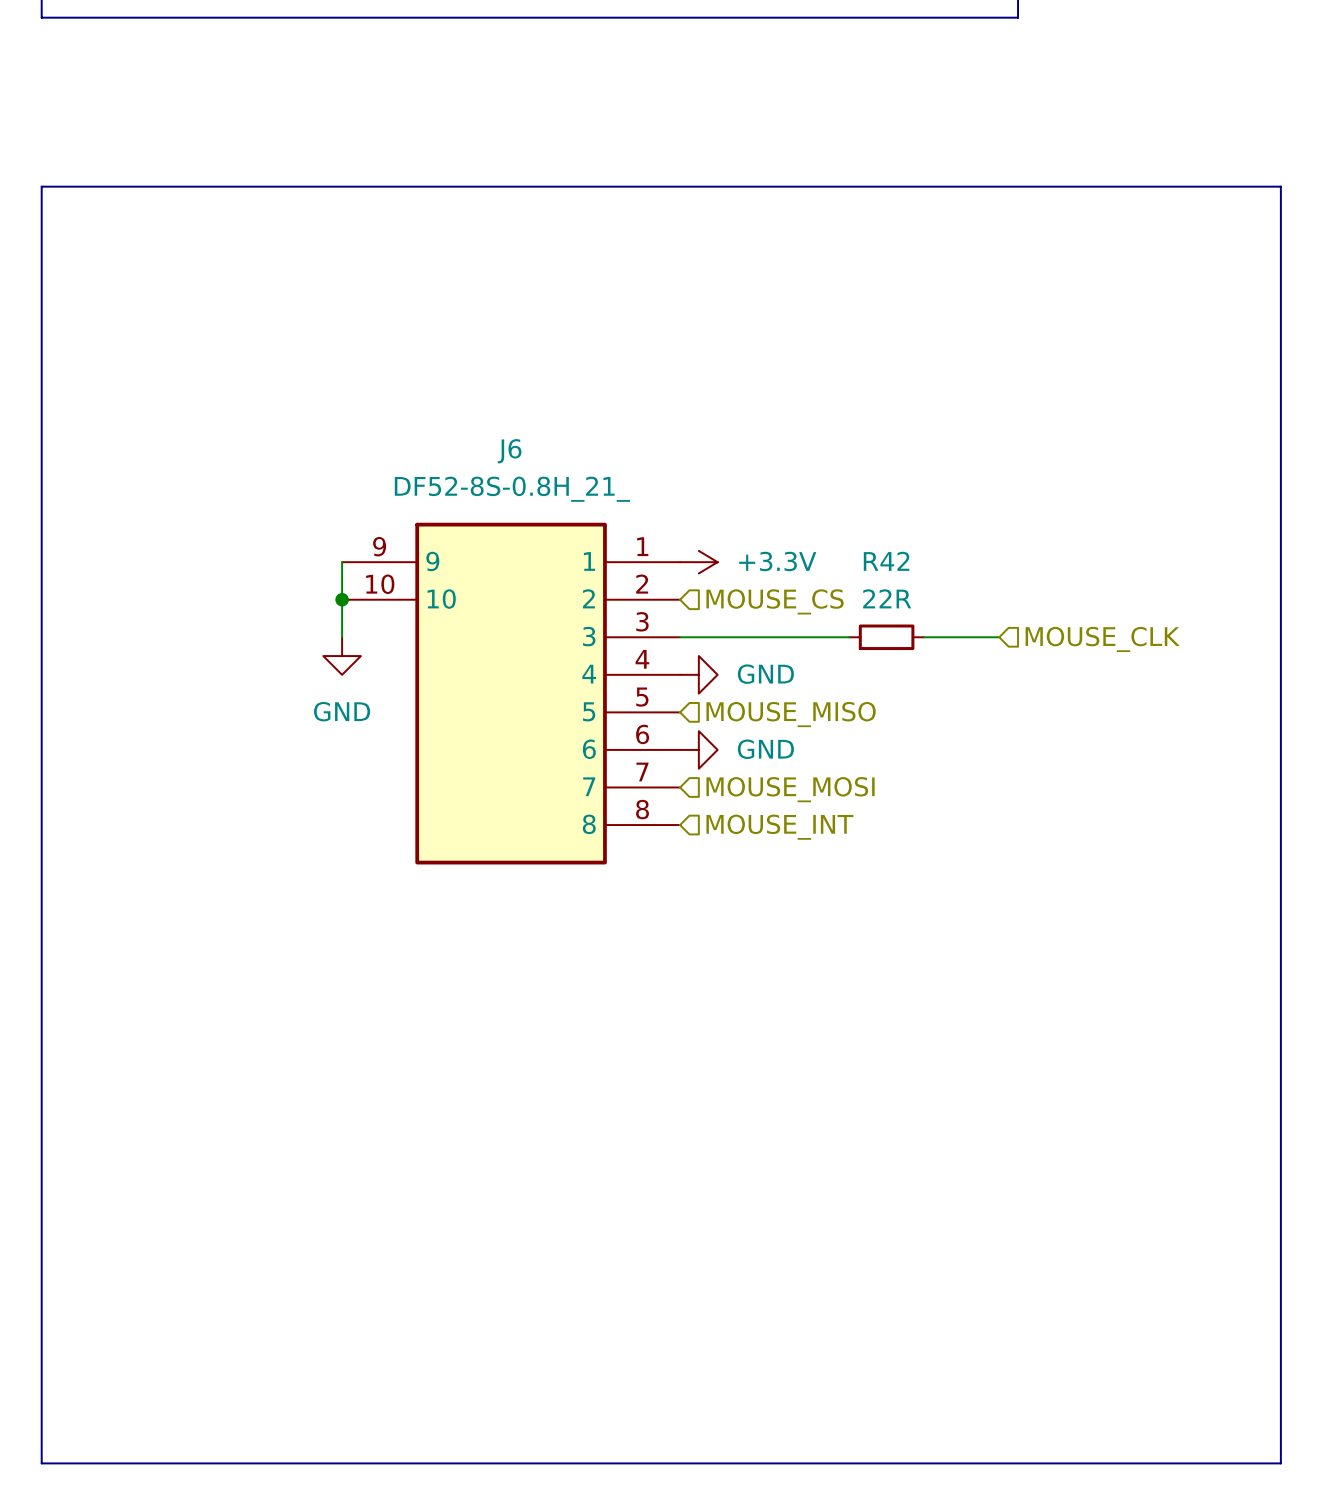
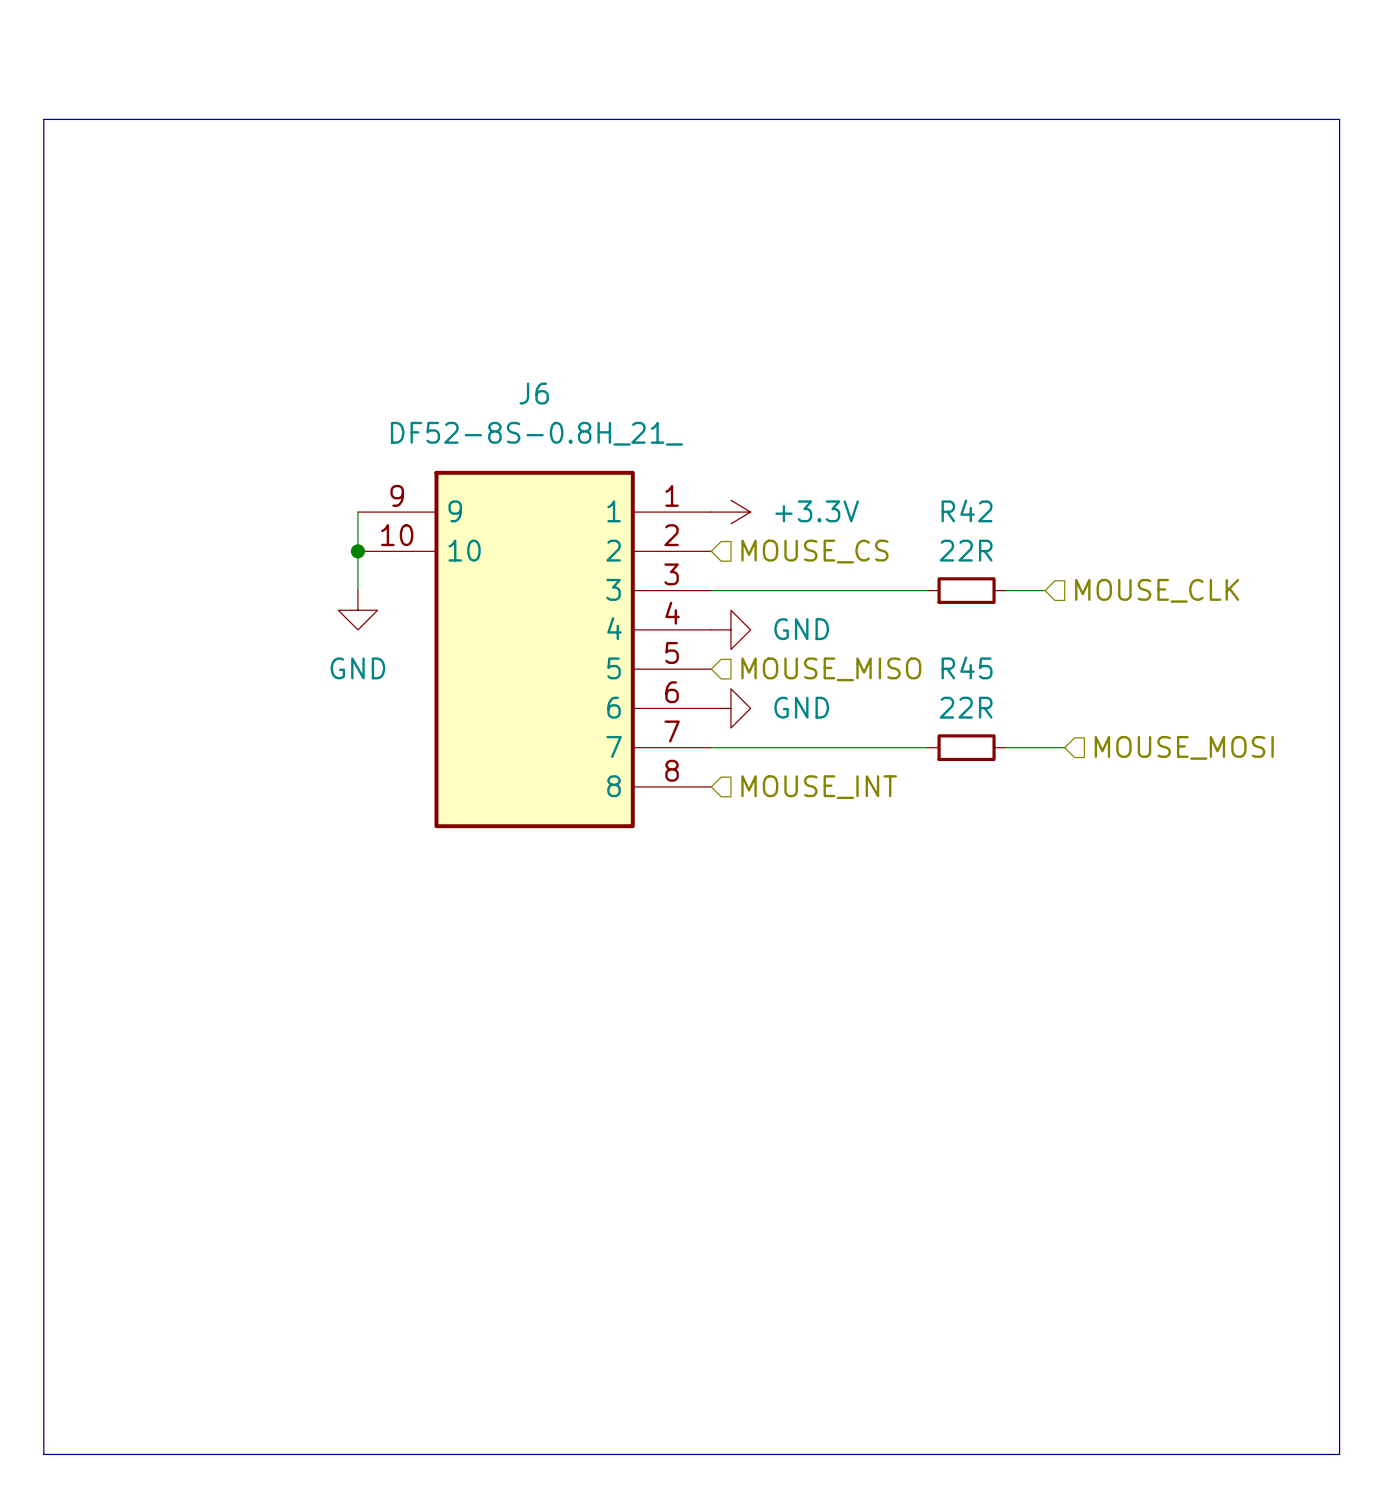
R42 position: (886, 637) -> (966, 590)
wire: (924, 637) (961, 637) -> (888, 590) (927, 590)
wire: none -> (711, 747) (927, 747)
R45: none -> 22R (966, 747)
wire: none -> (1005, 747) (1064, 747)
hierarchical label position: MOUSE_MOSI (790, 789) -> MOUSE_MOSI (1184, 747)

